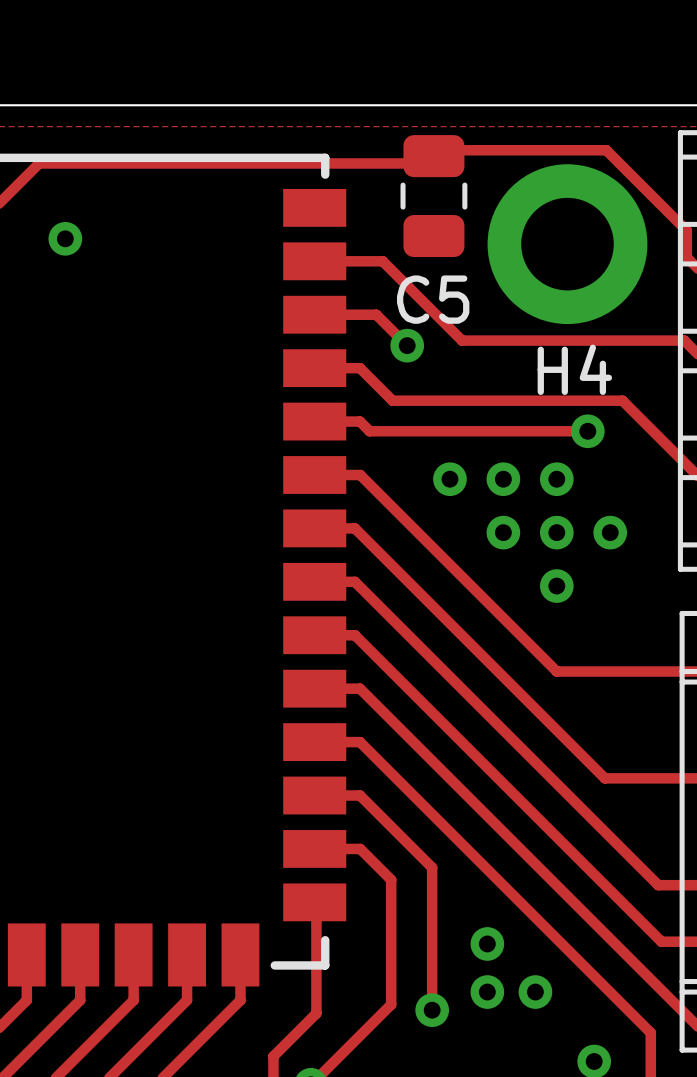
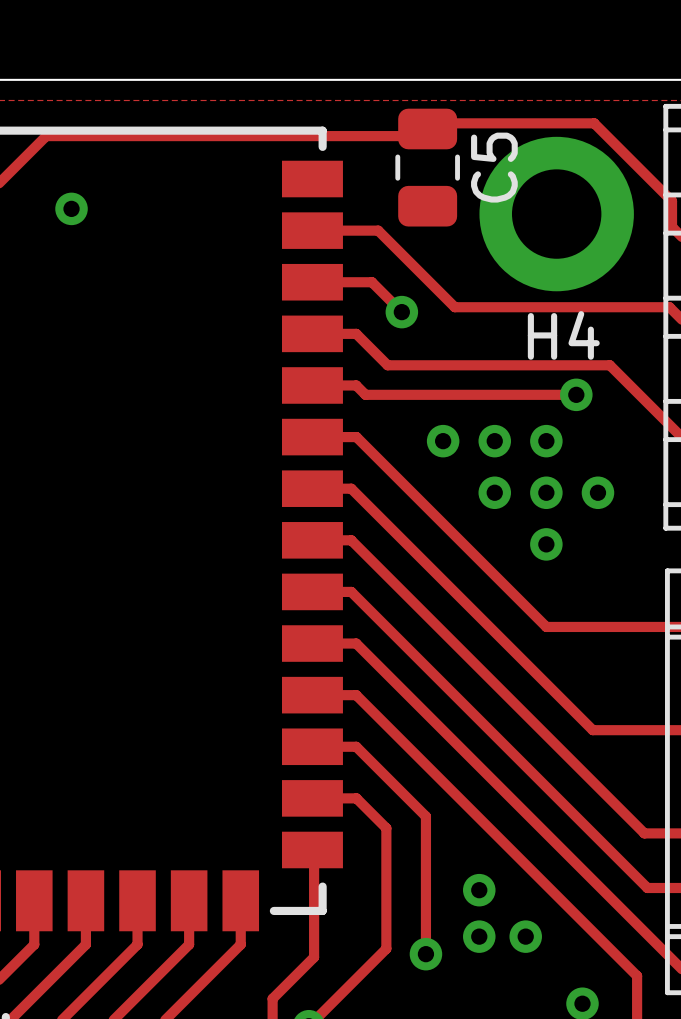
C5 name rotation: 0° (433, 299) -> 90° counterclockwise (494, 167)
C5 name position: C5 (433, 299) -> C5 (494, 167)

